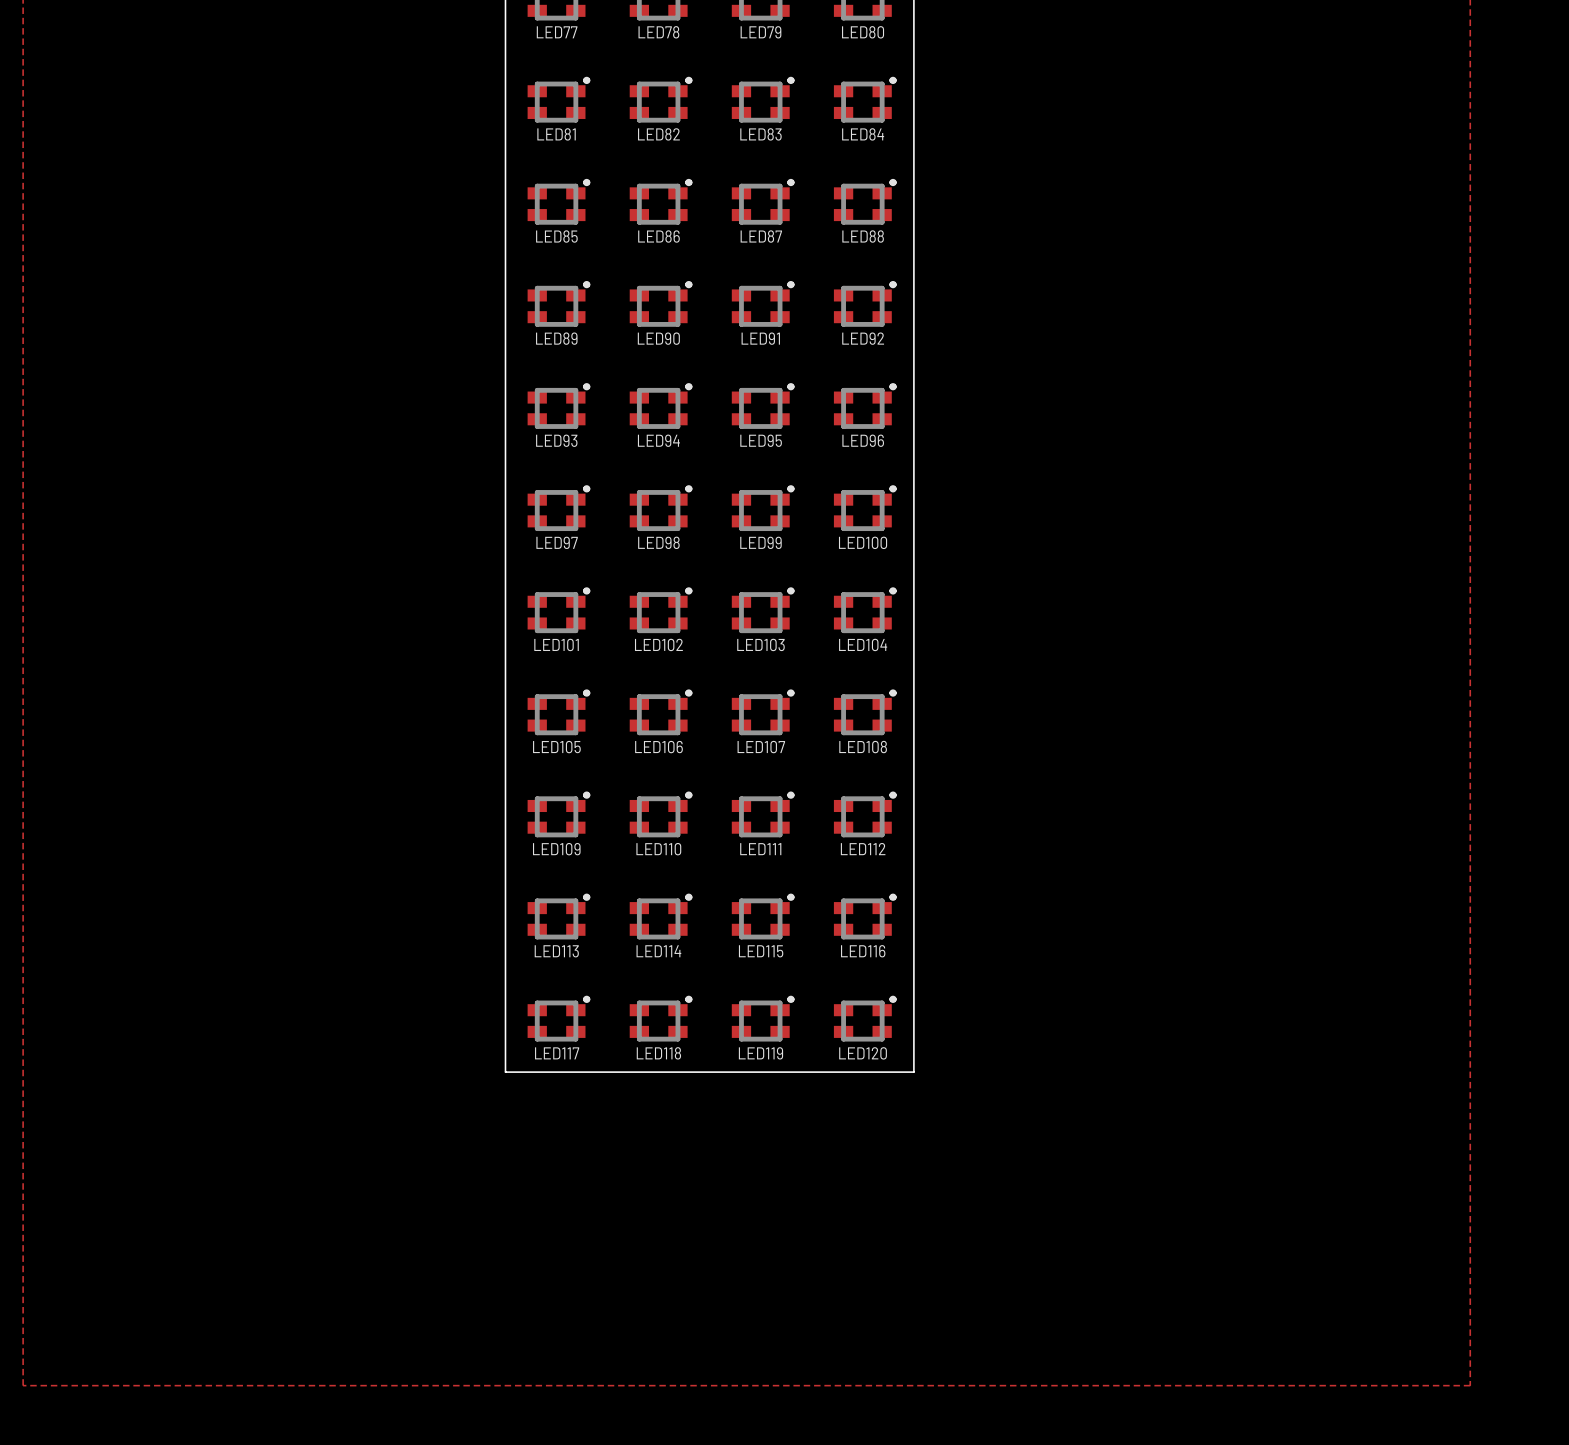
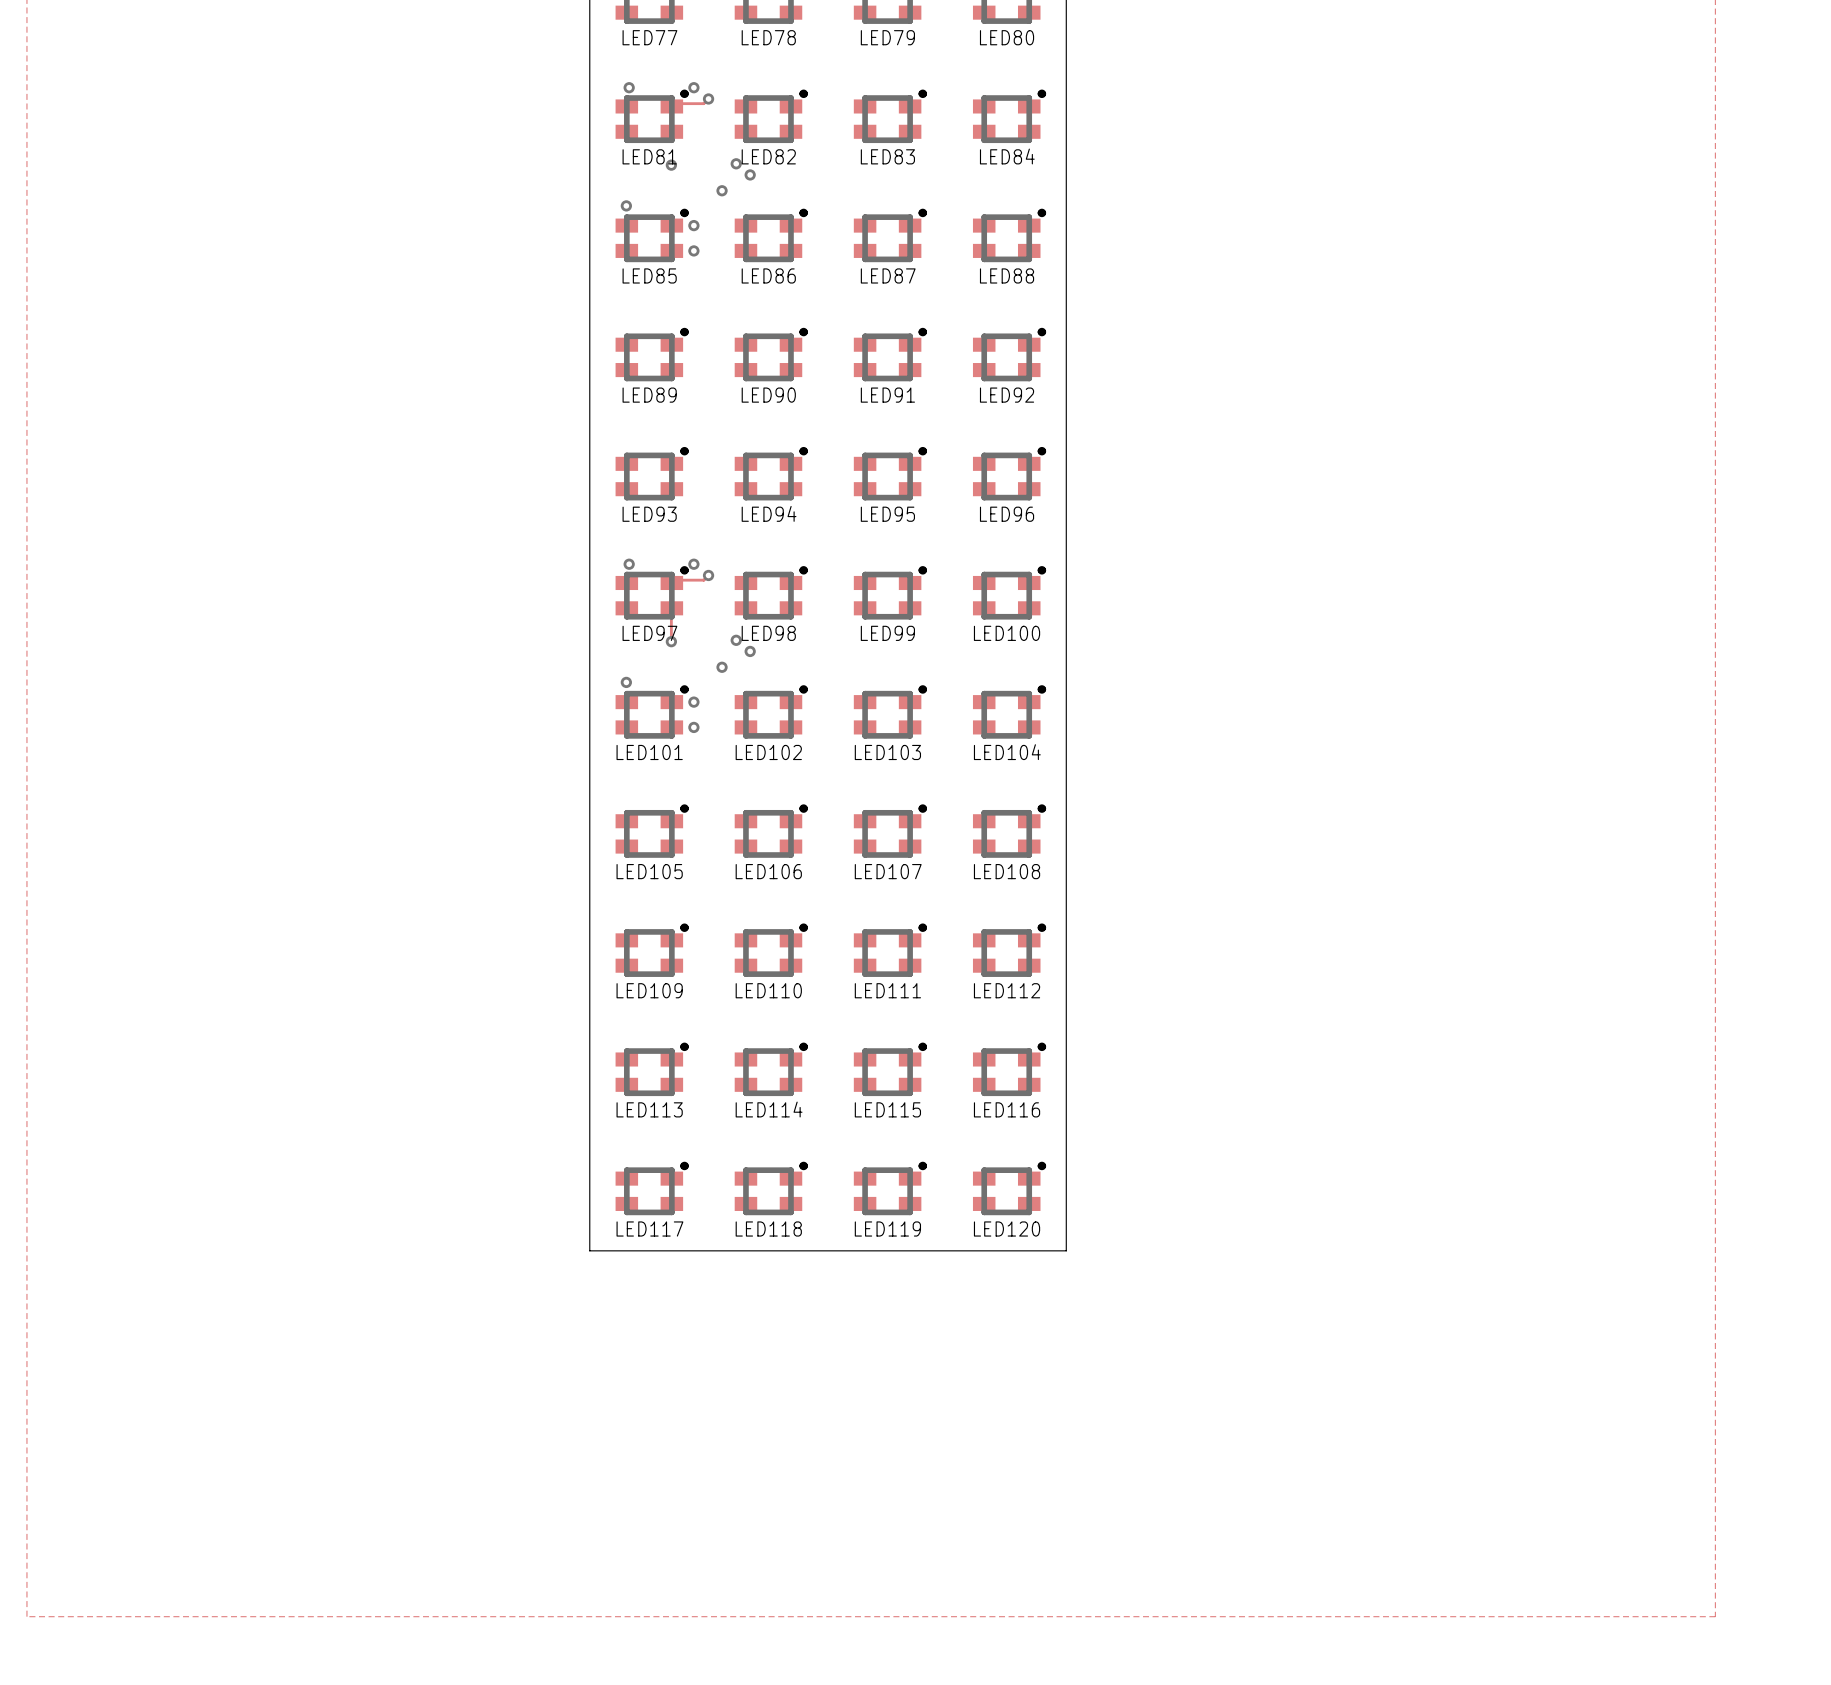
via: none -> (629, 87)
via: none -> (693, 87)
track: none -> (708, 98) (703, 103) (674, 103) (671, 106)
via: none -> (708, 98)
via: none -> (736, 163)
via: none -> (671, 165)
via: none -> (750, 174)
via: none -> (722, 190)
via: none -> (626, 205)
via: none -> (693, 225)
via: none -> (693, 250)
via: none -> (629, 564)
via: none -> (693, 564)
track: none -> (708, 575) (703, 580) (674, 580) (671, 582)
via: none -> (708, 575)
track: none -> (671, 608) (671, 641)
via: none -> (736, 640)
via: none -> (671, 641)
via: none -> (750, 651)
via: none -> (722, 667)
via: none -> (626, 682)
via: none -> (693, 702)
via: none -> (693, 727)

